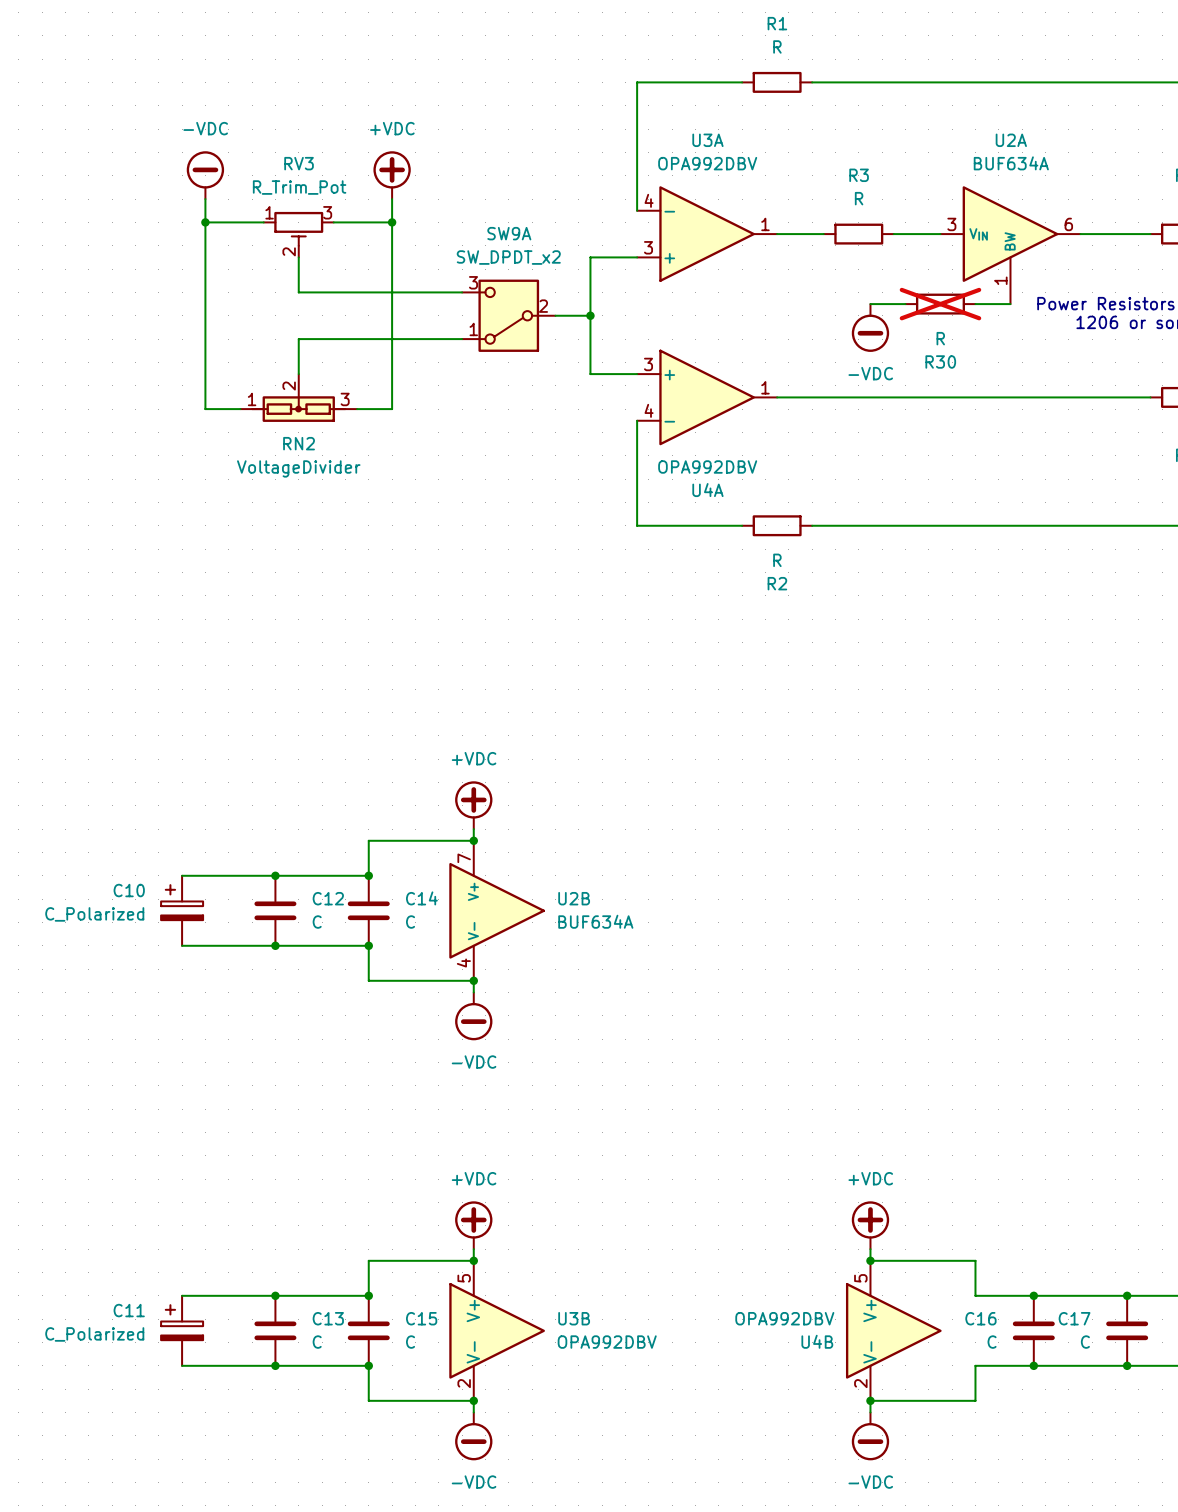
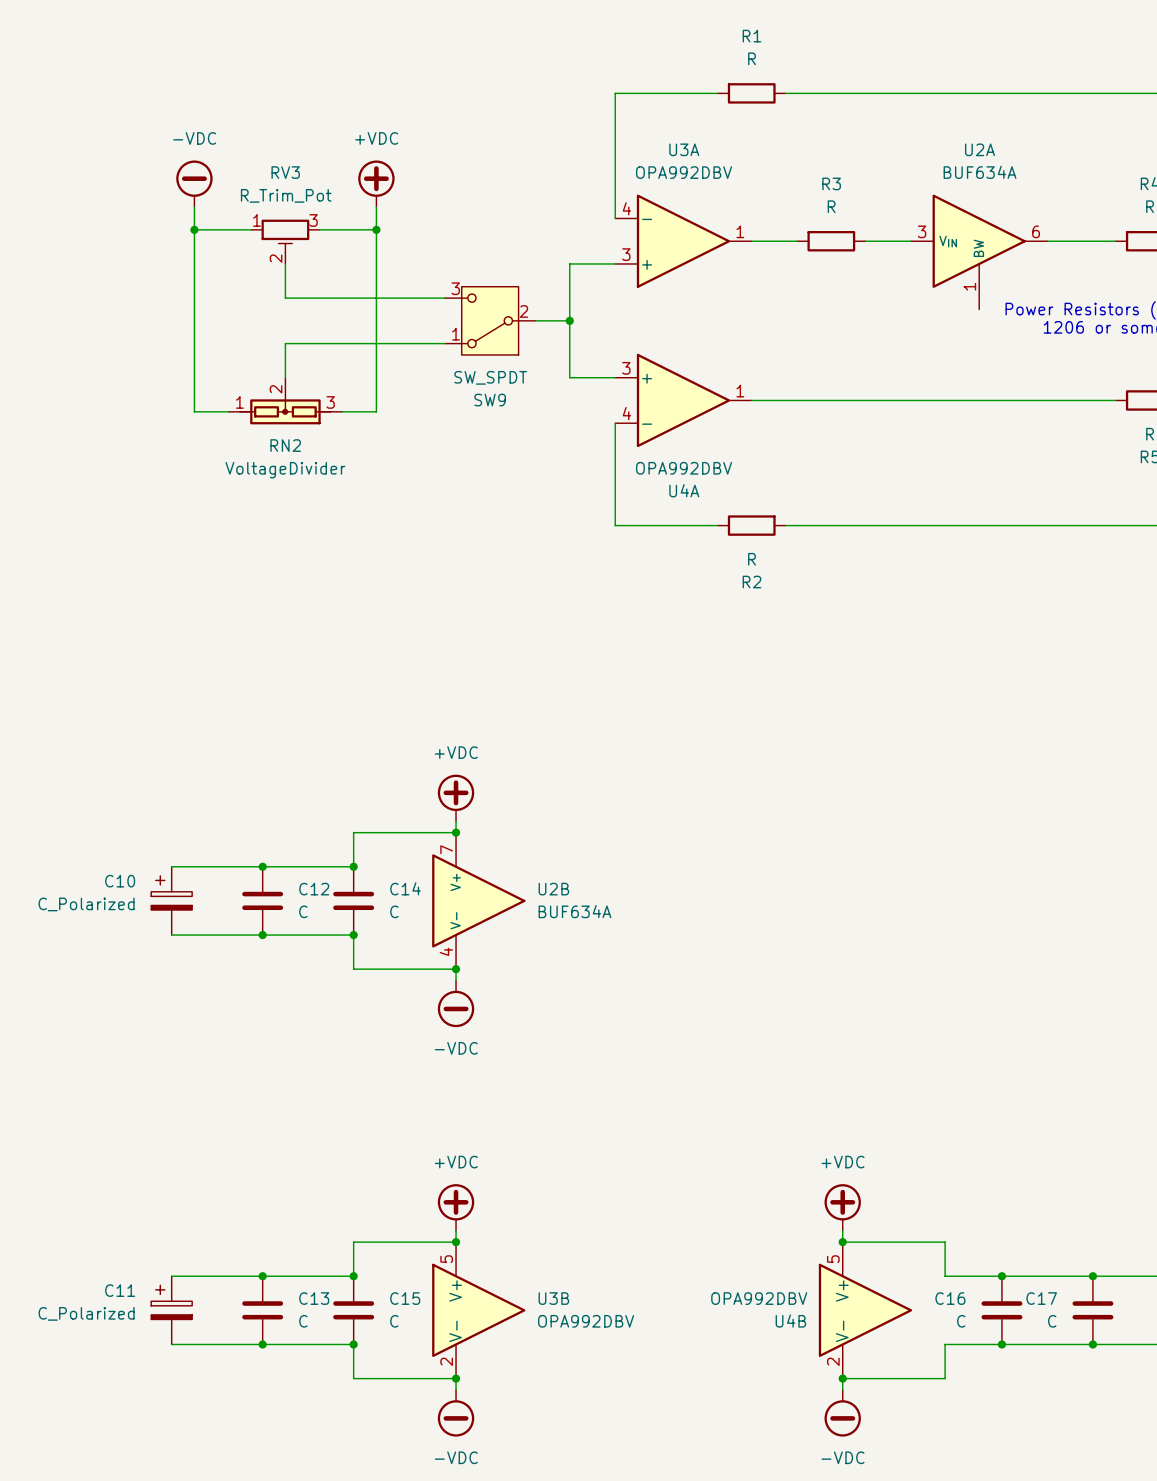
wire: (870, 304) (905, 304) -> none
R30: R (940, 304) -> none
wire: (975, 304) (1010, 304) -> none
SW9A: SW_DPDT_x2 (508, 315) -> none
SW9: none -> SW_SPDT (490, 320)
power symbol: -VDC (870, 328) -> none

